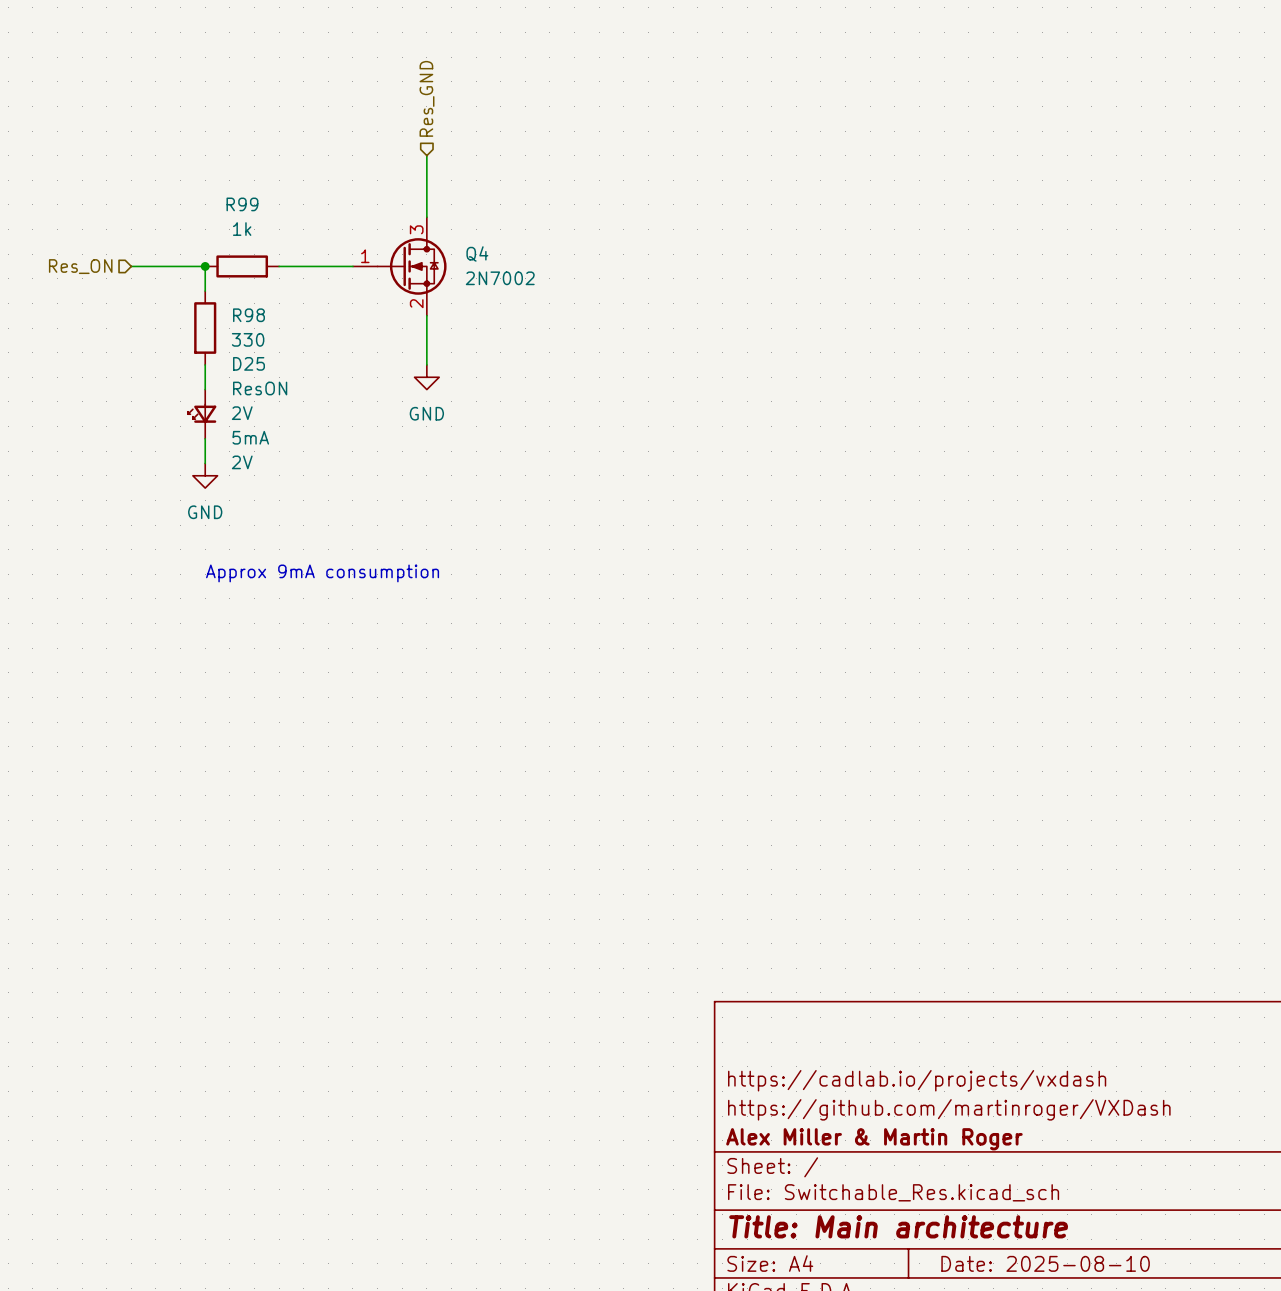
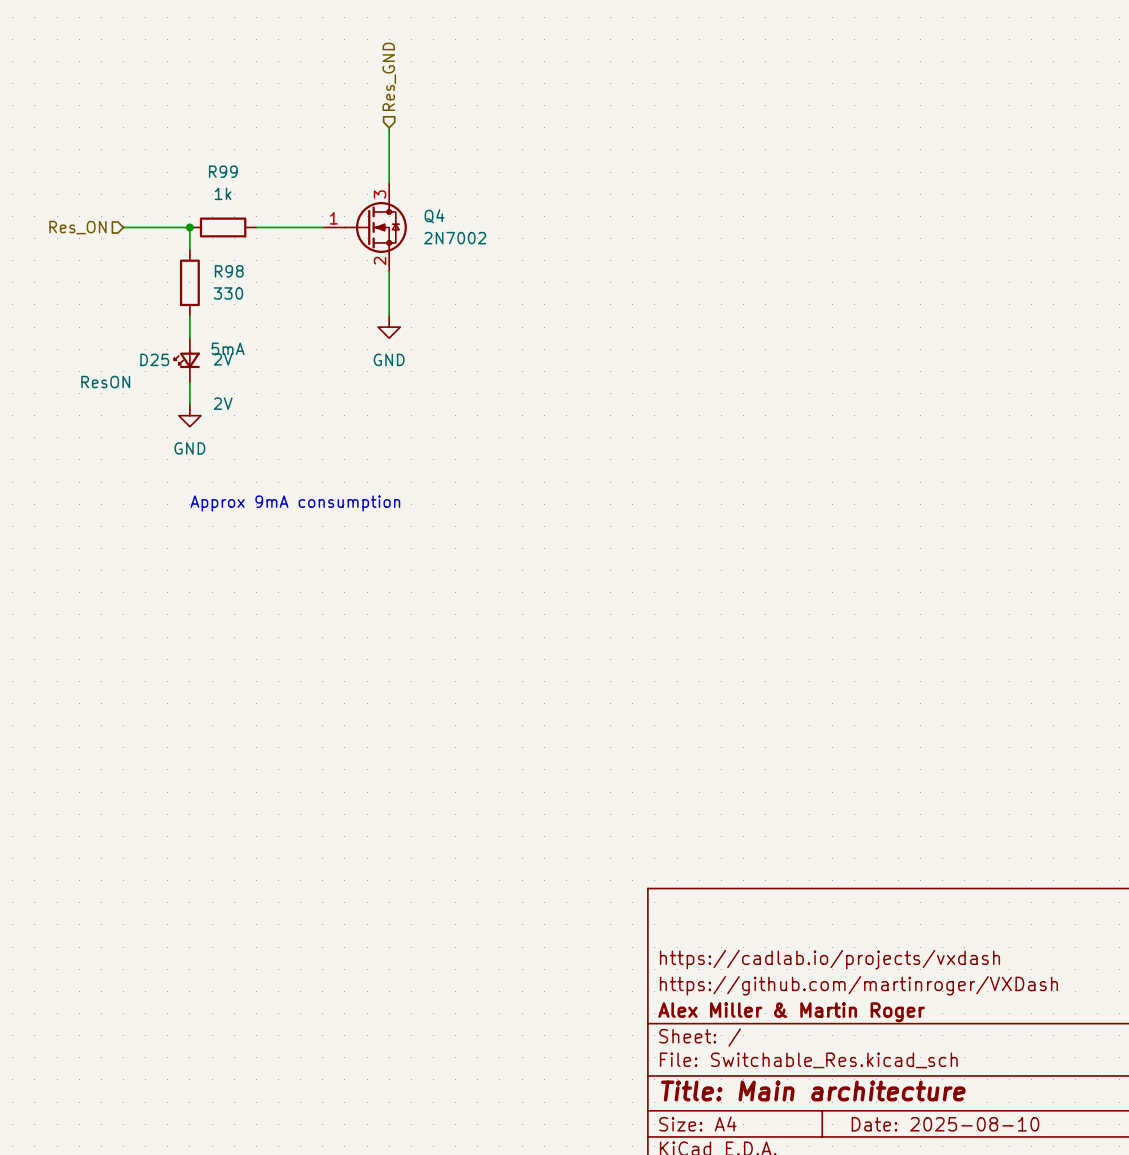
D25 name position: D25 (249, 363) -> D25 (154, 359)
D25 value position: ResON (260, 388) -> ResON (105, 382)
D25 text position: 5mA (250, 437) -> 5mA (228, 348)

